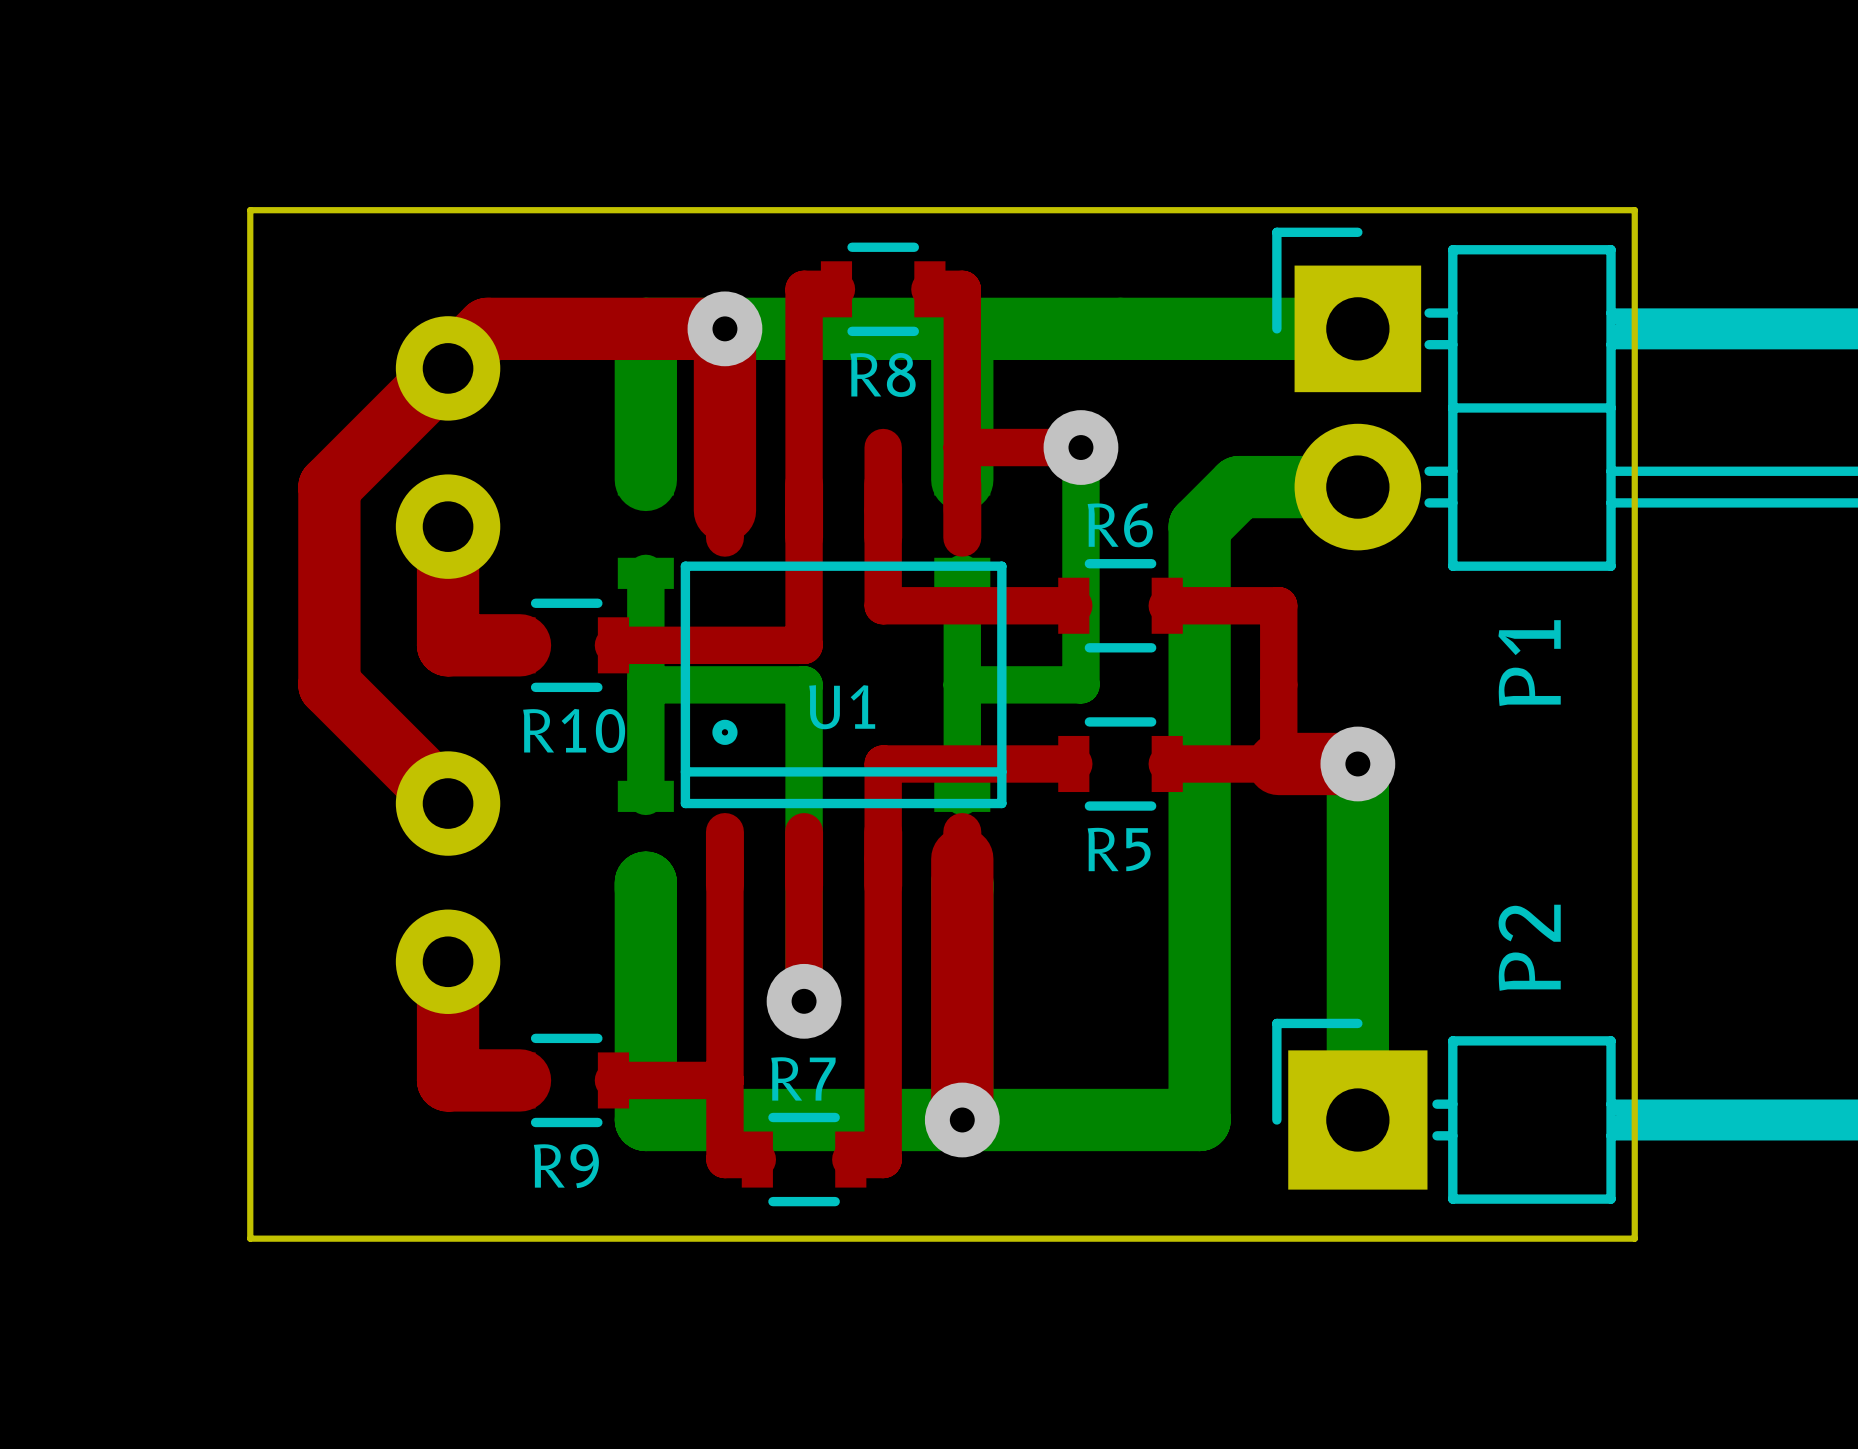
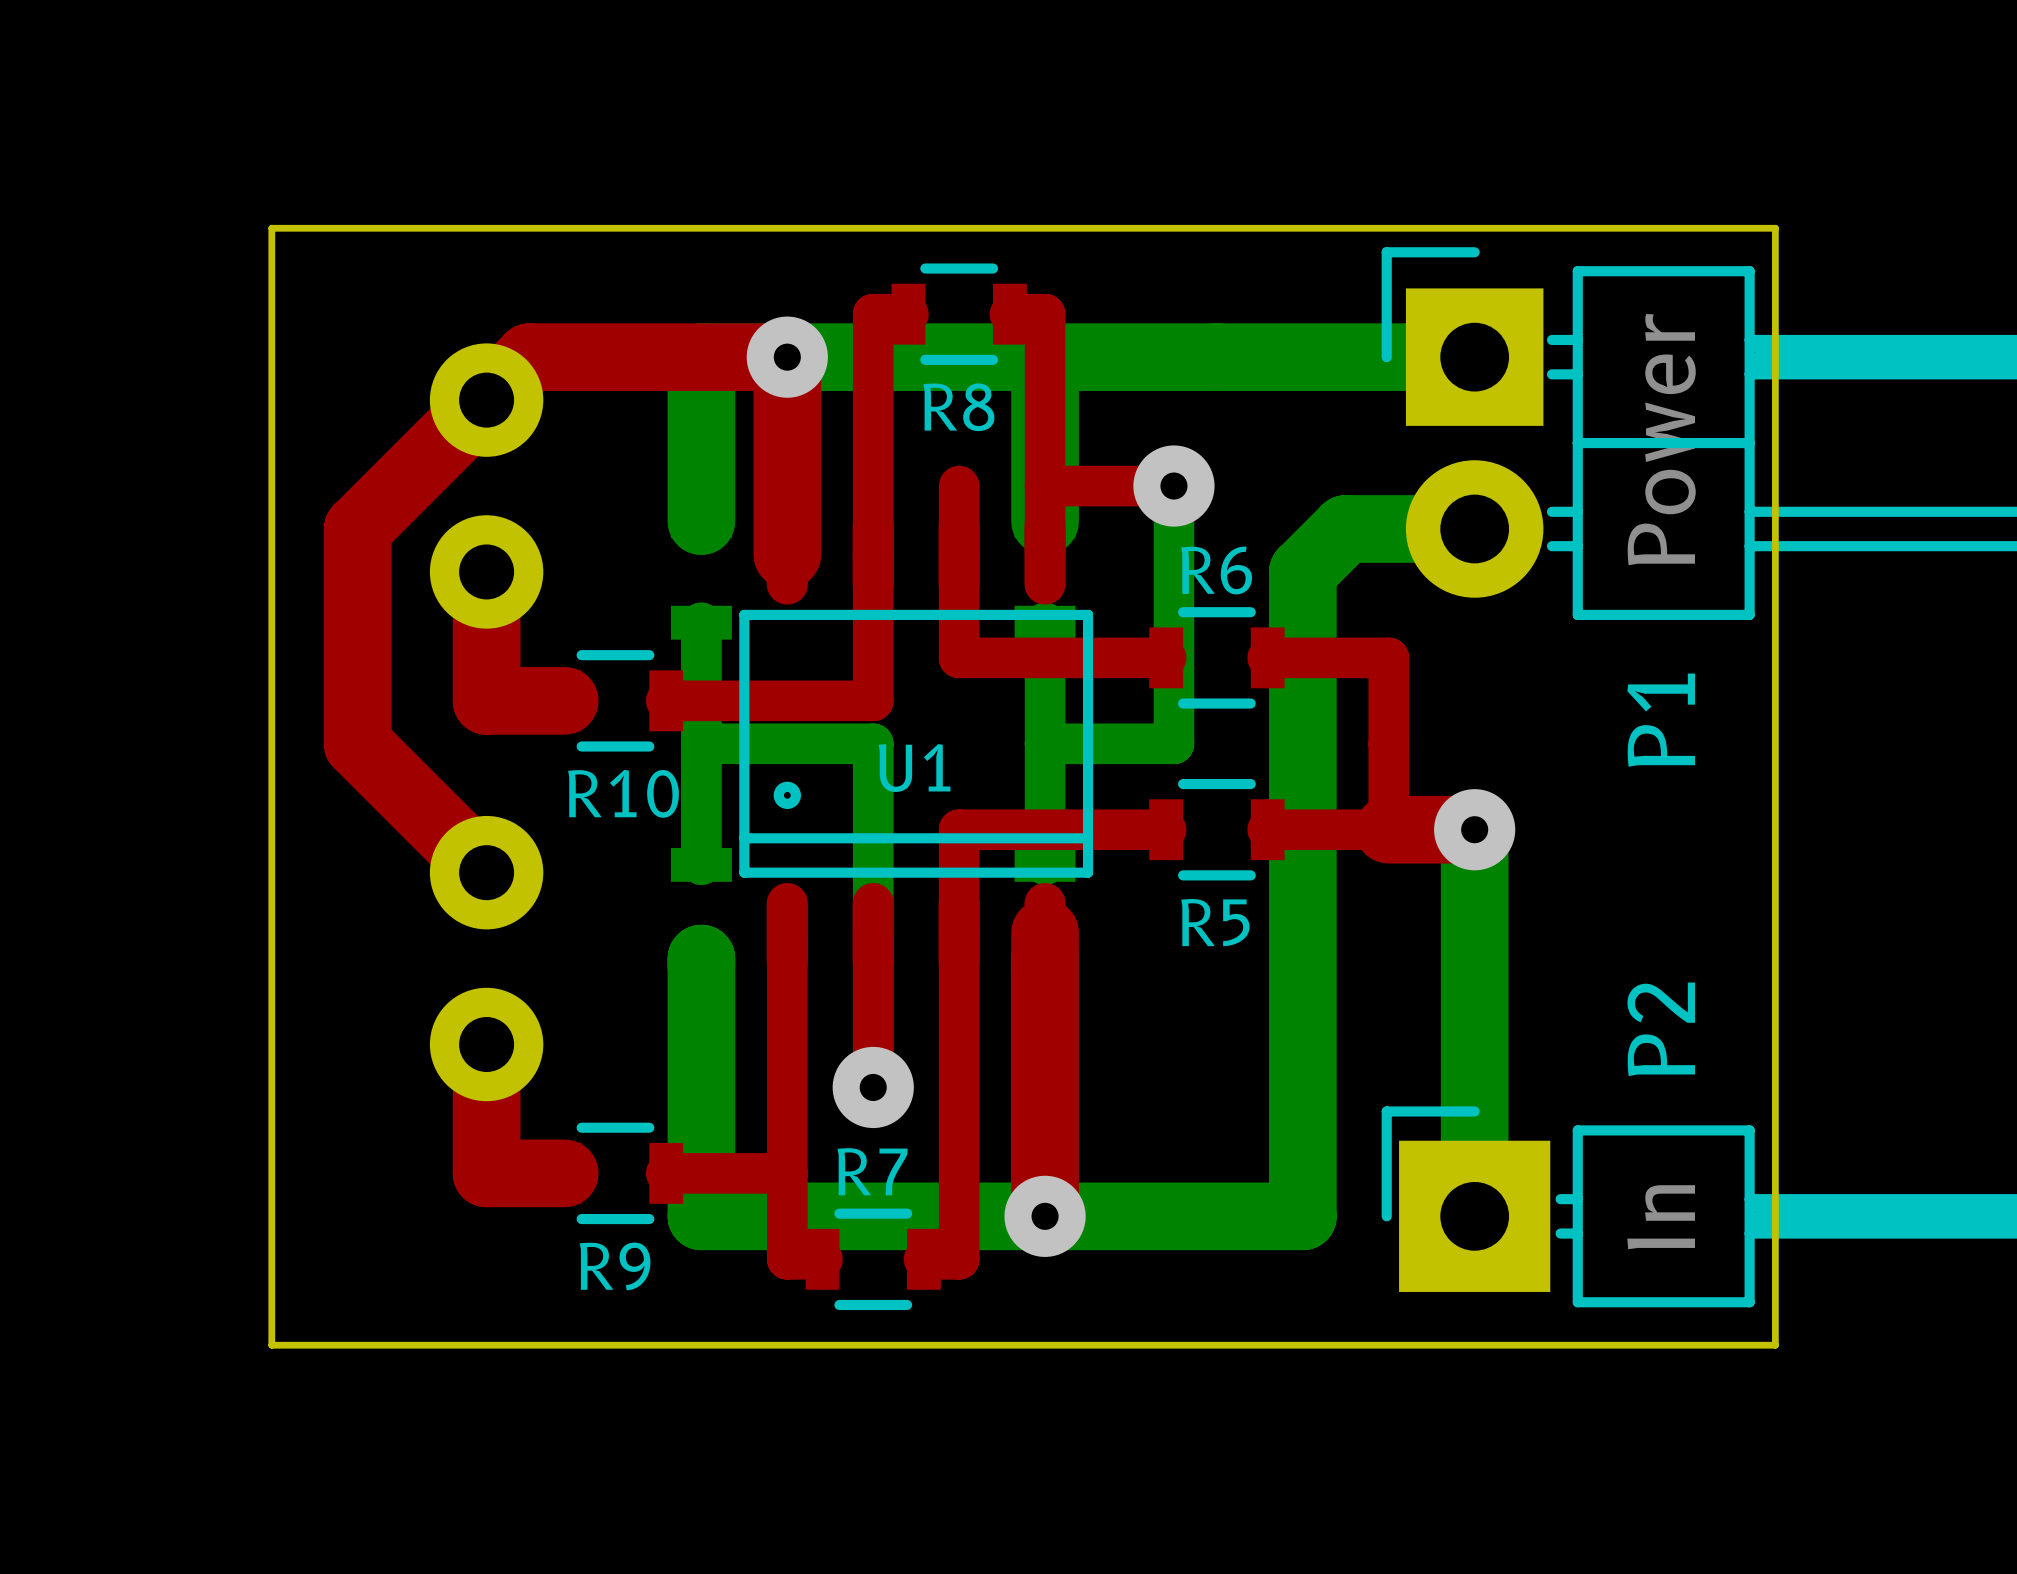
P1 value: none -> Power (1661, 439)
P2 value: none -> In (1661, 1217)

